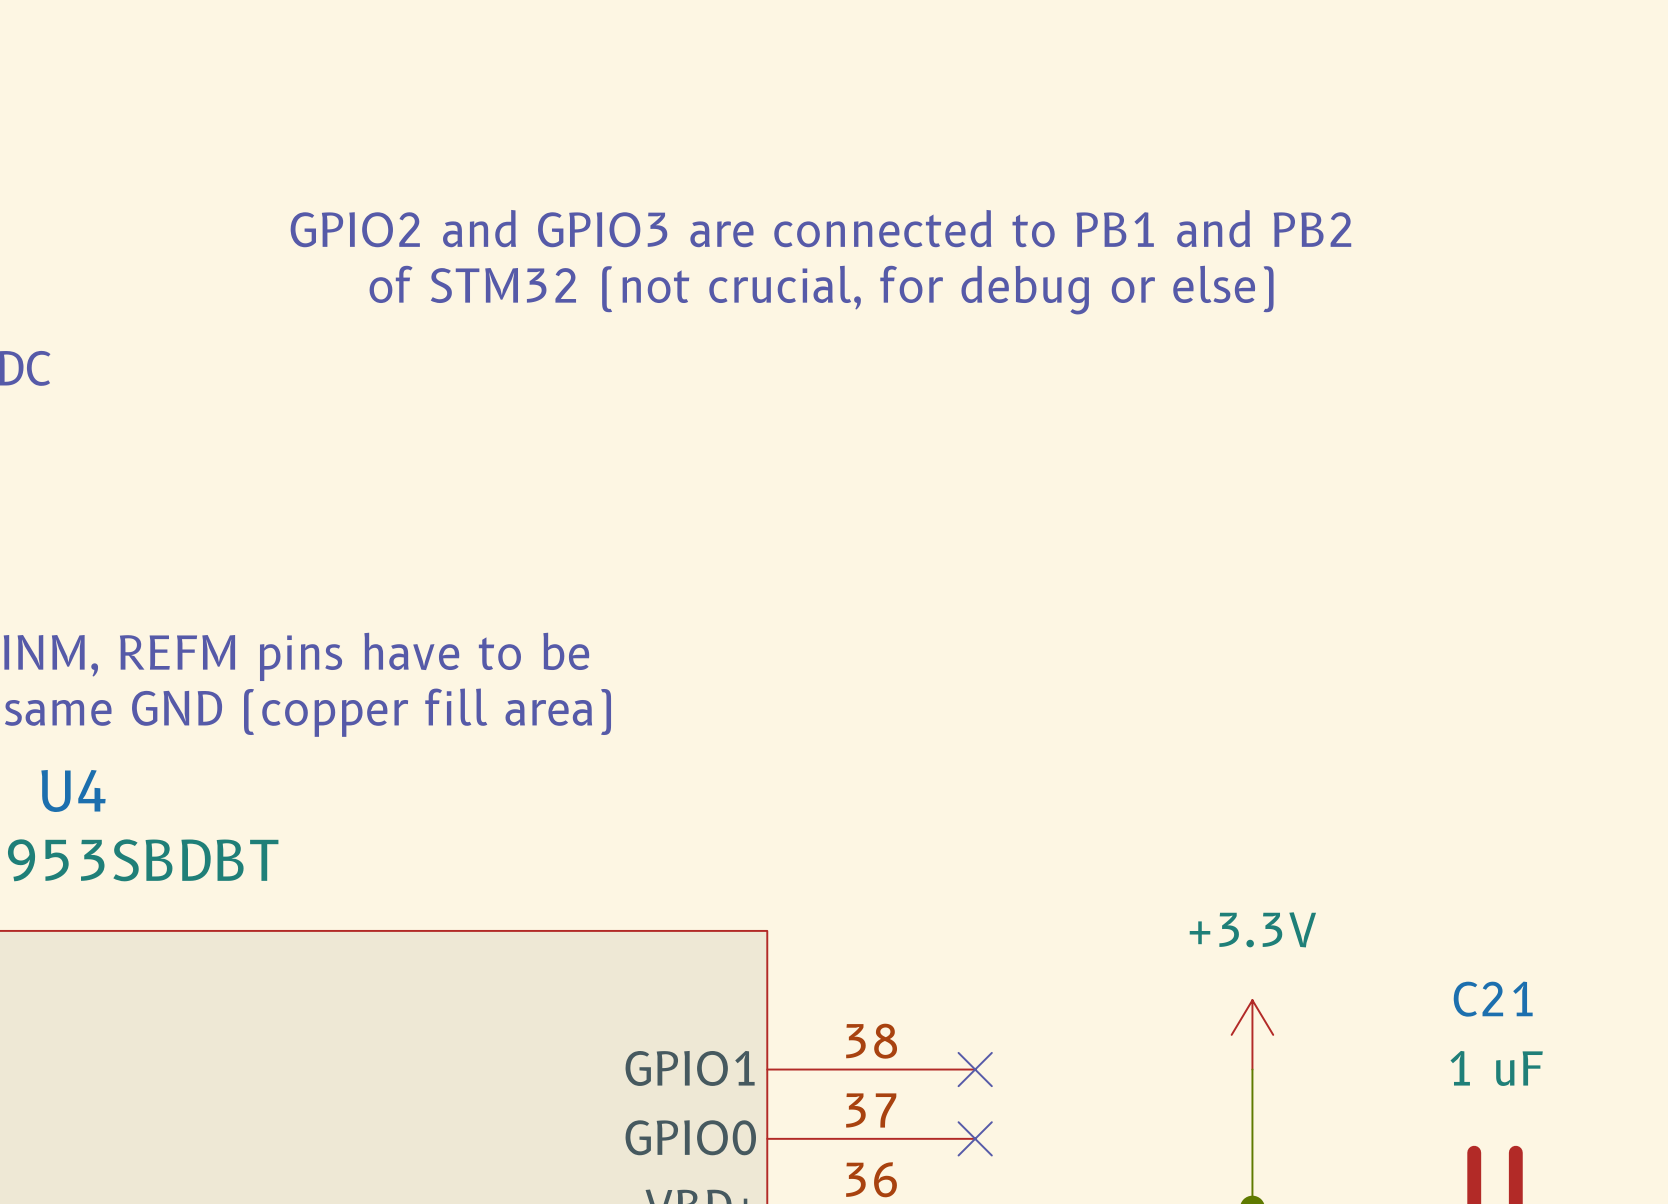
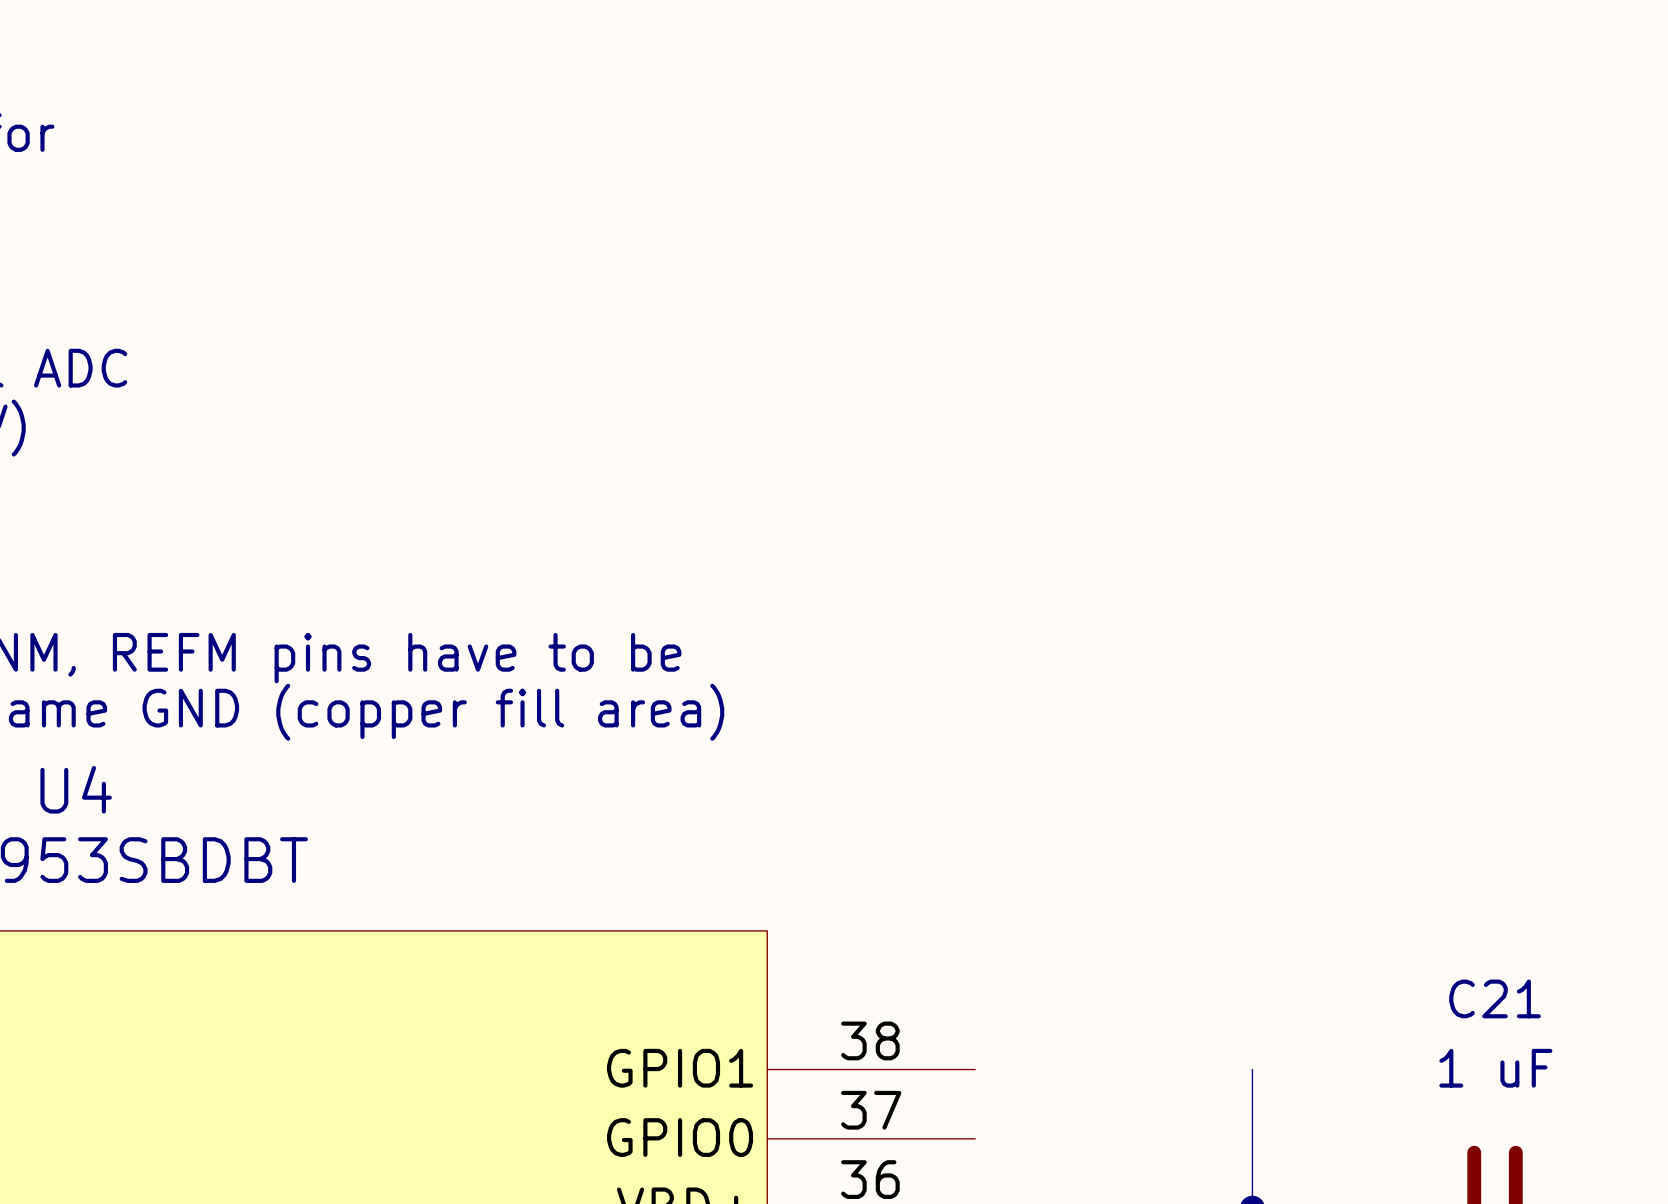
text: GPIO2 and GPIO3 are connected to PB1 and PB2 (820, 228) -> none
text: of STM32 (not crucial, for debug or else) (821, 290) -> none
power symbol: +3.3V (1252, 1034) -> none
no-connect mark: (975, 1069) -> none
no-connect mark: (975, 1138) -> none

